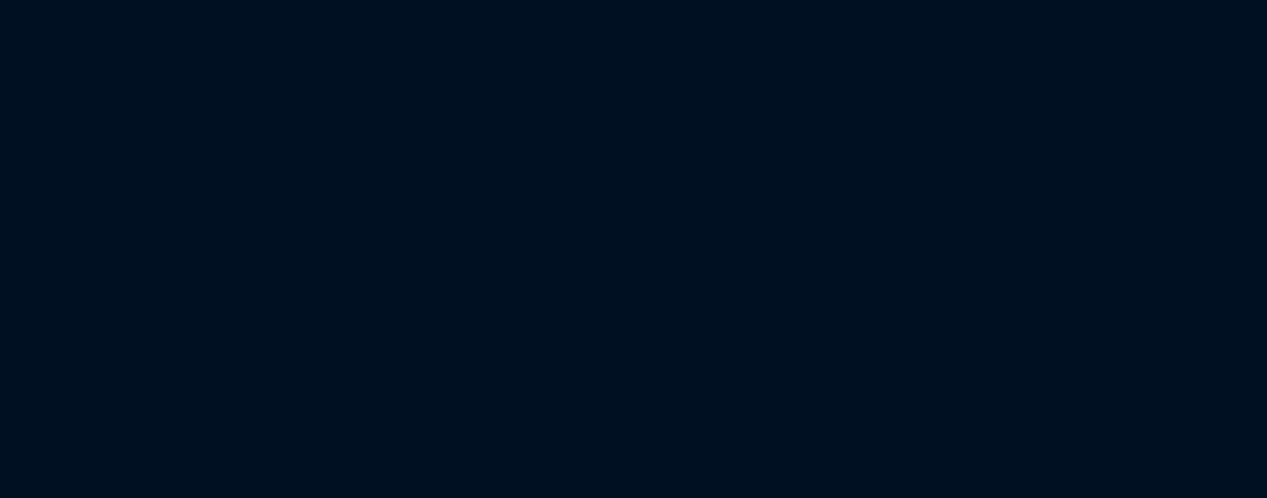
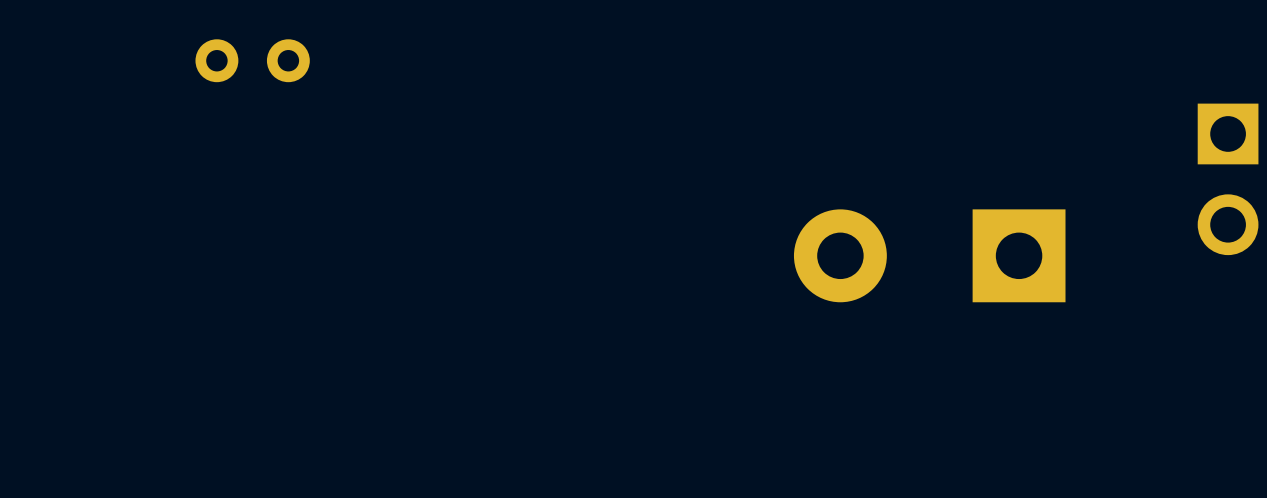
part: none -> (252, 60)
part: none -> (1228, 179)
part: none -> (929, 255)

